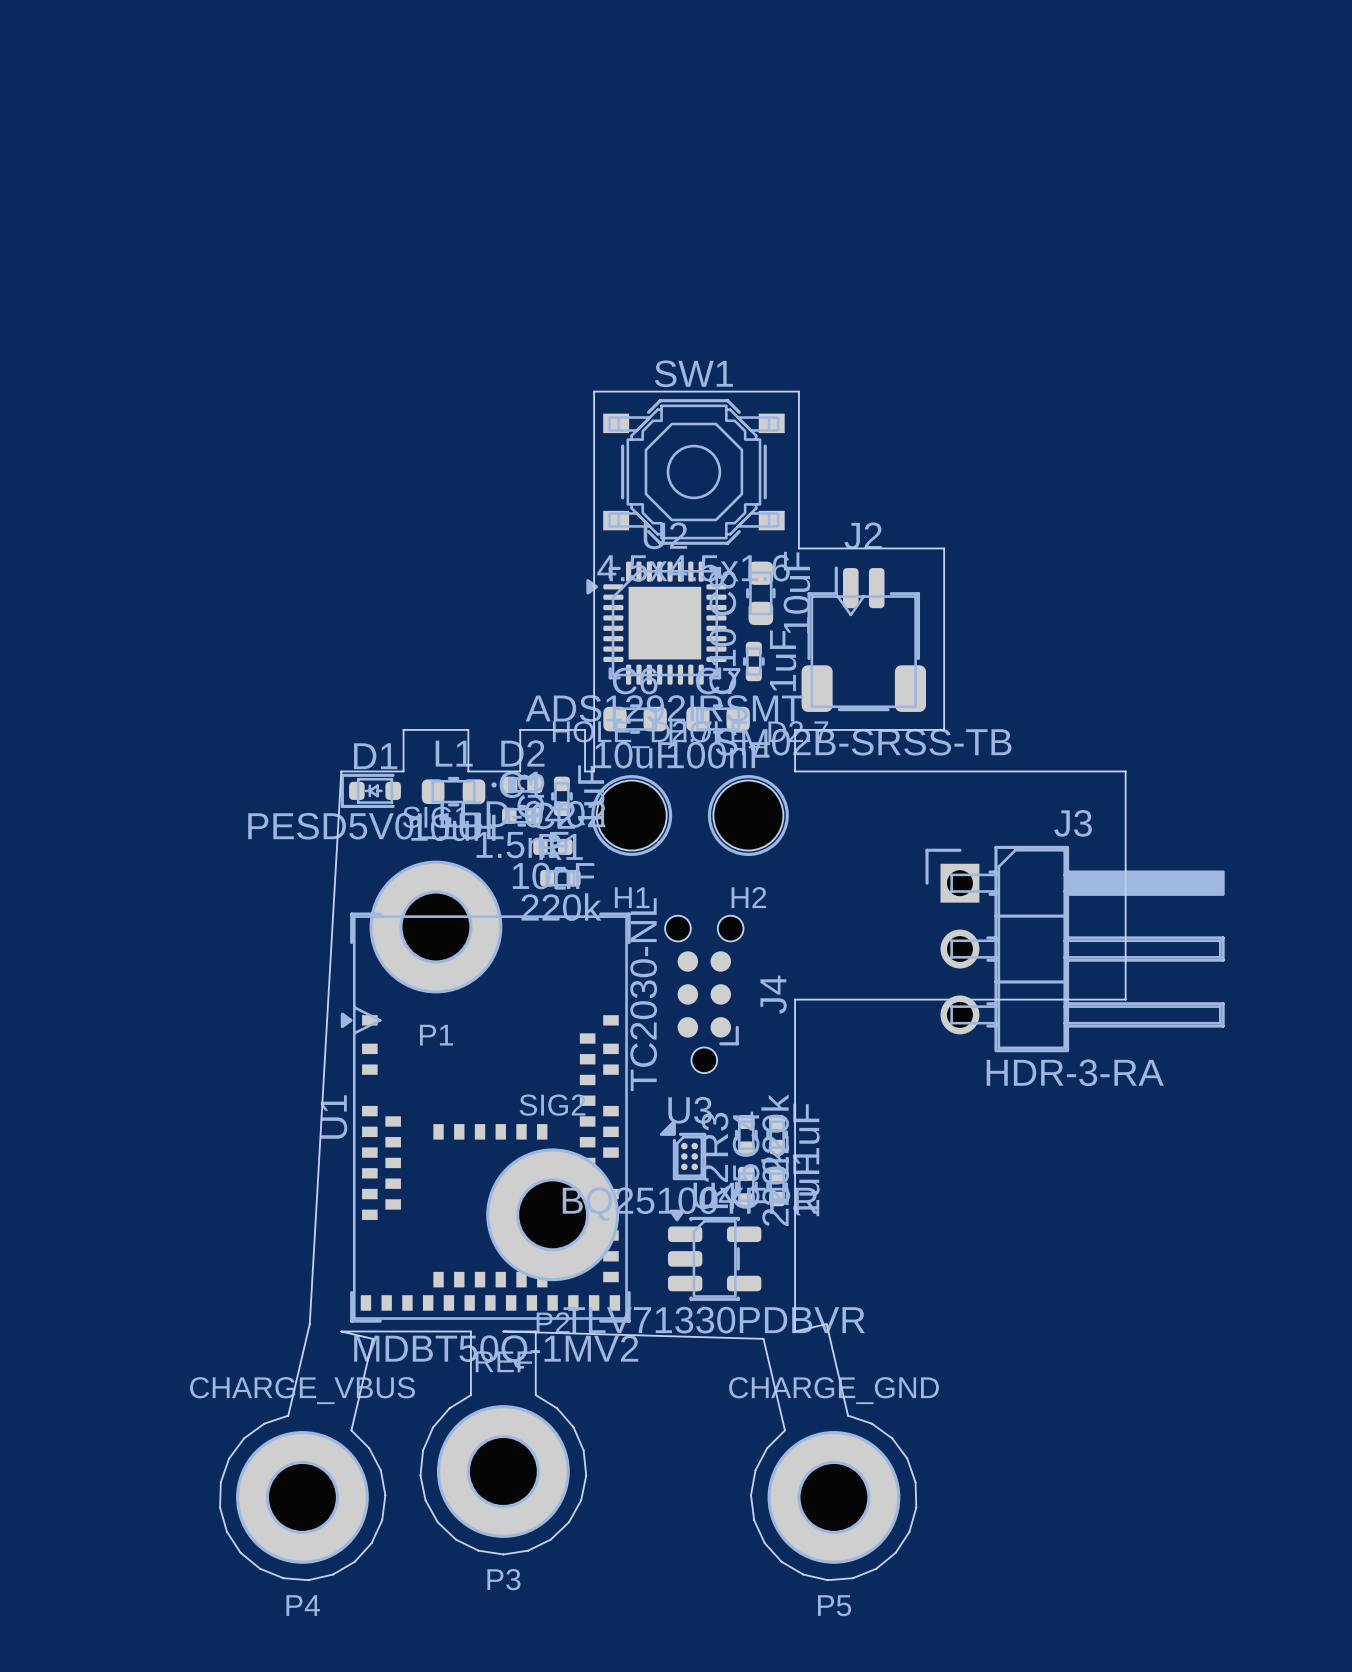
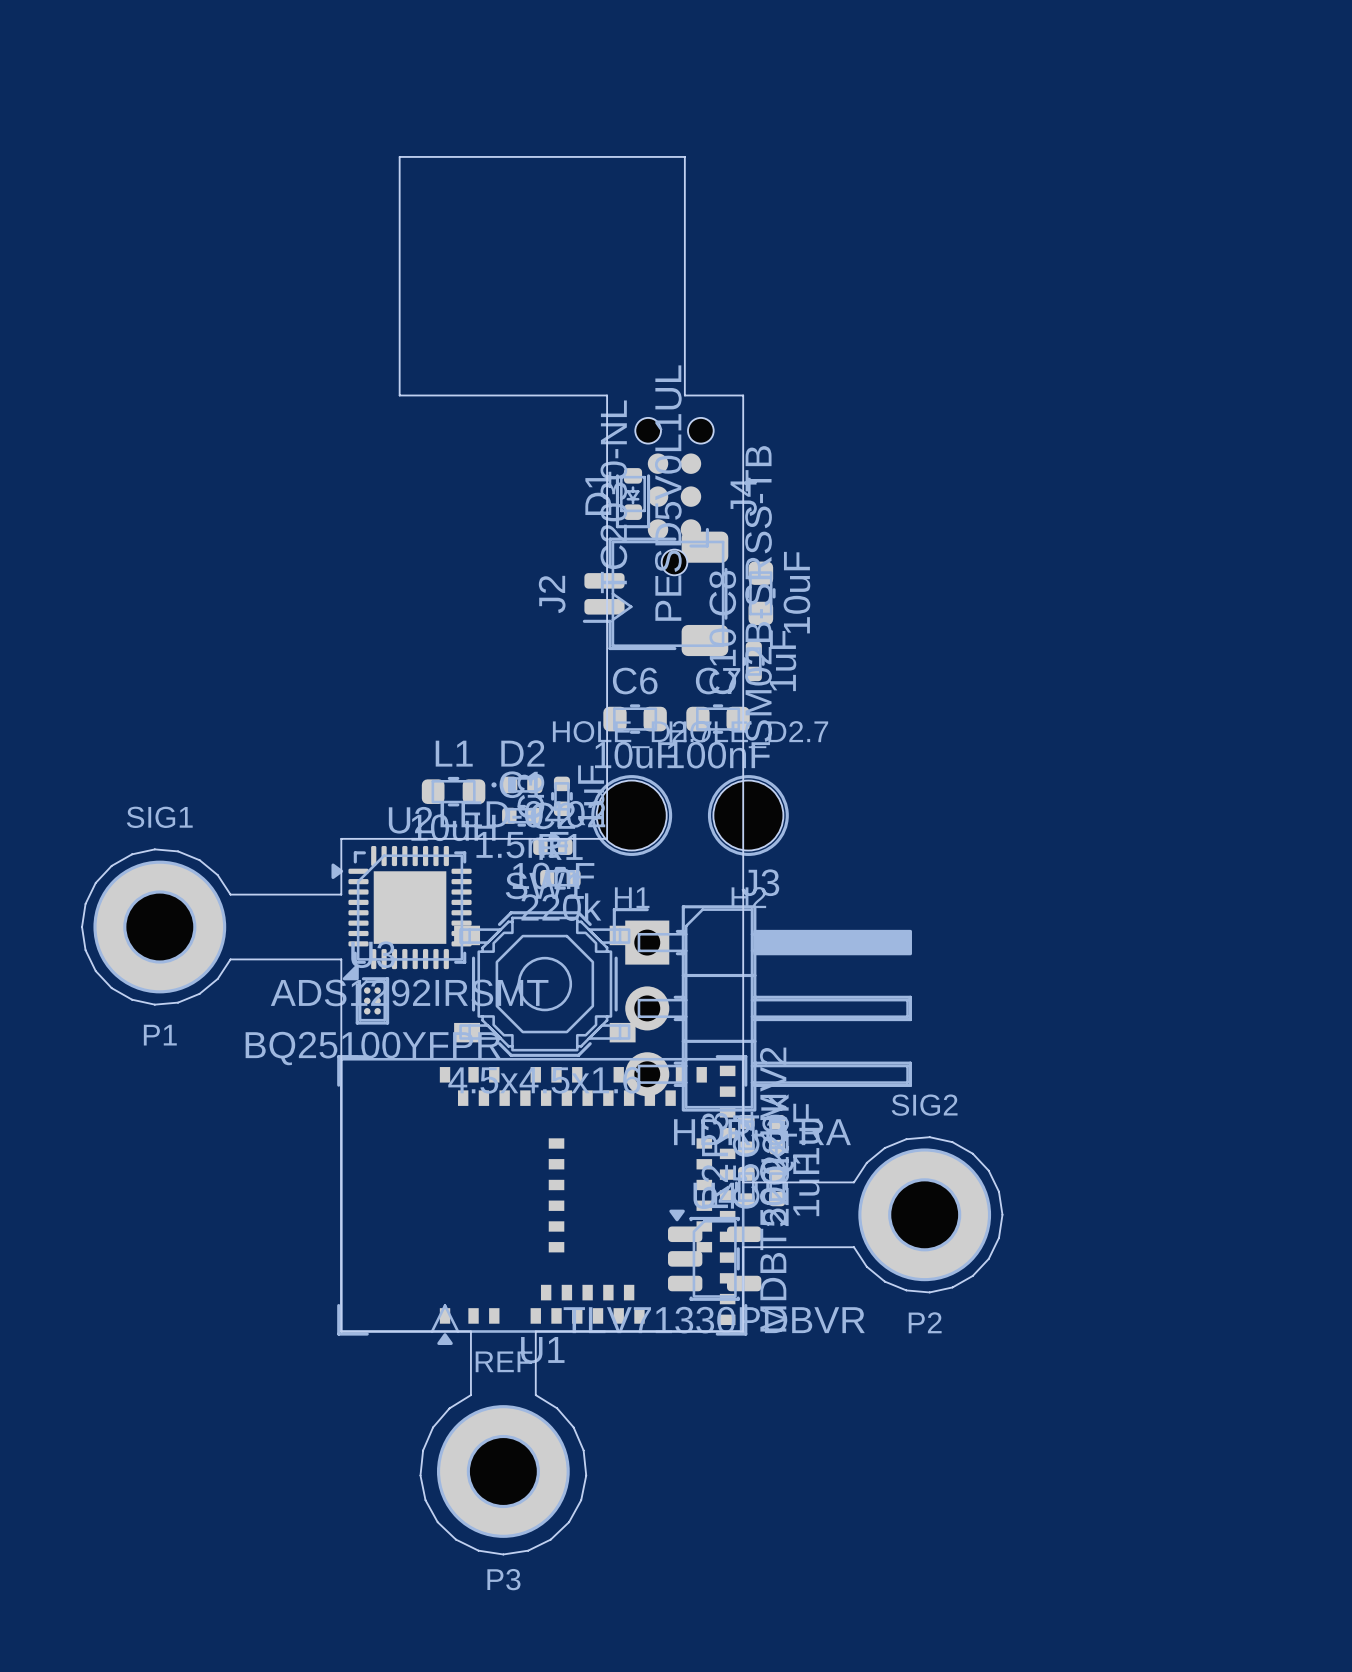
SW1 position: (693, 471) -> (544, 984)
U2 position: (656, 623) -> (401, 907)
J2 rotation: 0° (863, 639) -> 90° counterclockwise (655, 593)
J2 position: (863, 639) -> (655, 593)
D1 rotation: 0° (370, 790) -> 90° counterclockwise (633, 498)
D1 position: (370, 790) -> (633, 498)
J3 footprint: [925, 845, 1225, 1053] -> [612, 905, 912, 1112]
P1 position: (435, 927) -> (159, 927)
J4 position: (704, 994) -> (674, 496)
U1 rotation: 0° (485, 1117) -> 90° counterclockwise (542, 1200)
U3 position: (683, 1149) -> (365, 994)
P2 position: (552, 1214) -> (924, 1214)
board edge: (341, 1331) (372, 1338) (351, 1430) (369, 1448) (380, 1470) (385, 1495) (382, 1520) (371, 1543) (354, 1561) (333, 1574) (308, 1580) (283, 1578) (260, 1568) (240, 1552) (226, 1531) (220, 1507) (220, 1482) (229, 1458) (244, 1438) (264, 1423) (288, 1415) (309, 1324) (341, 771) (403, 771) (403, 729) (468, 729) (468, 771) (520, 771) (520, 729) (585, 729) (585, 771) (594, 771) (594, 391) (798, 391) (798, 548) (944, 548) (944, 729) (795, 729) (795, 771) (1125, 771) (1125, 999) (795, 999) (795, 1331) (826, 1324) (848, 1415) (871, 1423) (892, 1438) (907, 1458) (915, 1482) (916, 1507) (909, 1531) (895, 1552) (876, 1568) (852, 1578) (827, 1580) (803, 1574) (781, 1561) (764, 1543) (754, 1520) (751, 1495) (755, 1470) (767, 1448) (784, 1430) (763, 1338) (503, 1331) (535, 1331) -> (341, 1331) (341, 959) (230, 959) (217, 978) (199, 993) (178, 1002) (154, 1004) (132, 999) (111, 988) (95, 971) (85, 950) (82, 927) (85, 903) (95, 882) (111, 865) (132, 854) (154, 849) (178, 851) (199, 860) (217, 875) (230, 894) (341, 894) (341, 838) (607, 838) (607, 395) (399, 395) (399, 156) (684, 156) (684, 395) (743, 395) (743, 1182) (853, 1182) (866, 1162) (884, 1148) (906, 1139) (929, 1137) (952, 1142) (972, 1153) (988, 1170) (998, 1191) (1002, 1214) (998, 1237) (988, 1258) (972, 1275) (952, 1287) (929, 1292) (906, 1290) (884, 1281) (866, 1266) (853, 1247) (743, 1247) (743, 1331) (535, 1331)
P4: CHARGE_VBUS (302, 1497) -> none
P5: CHARGE_GND (833, 1497) -> none

